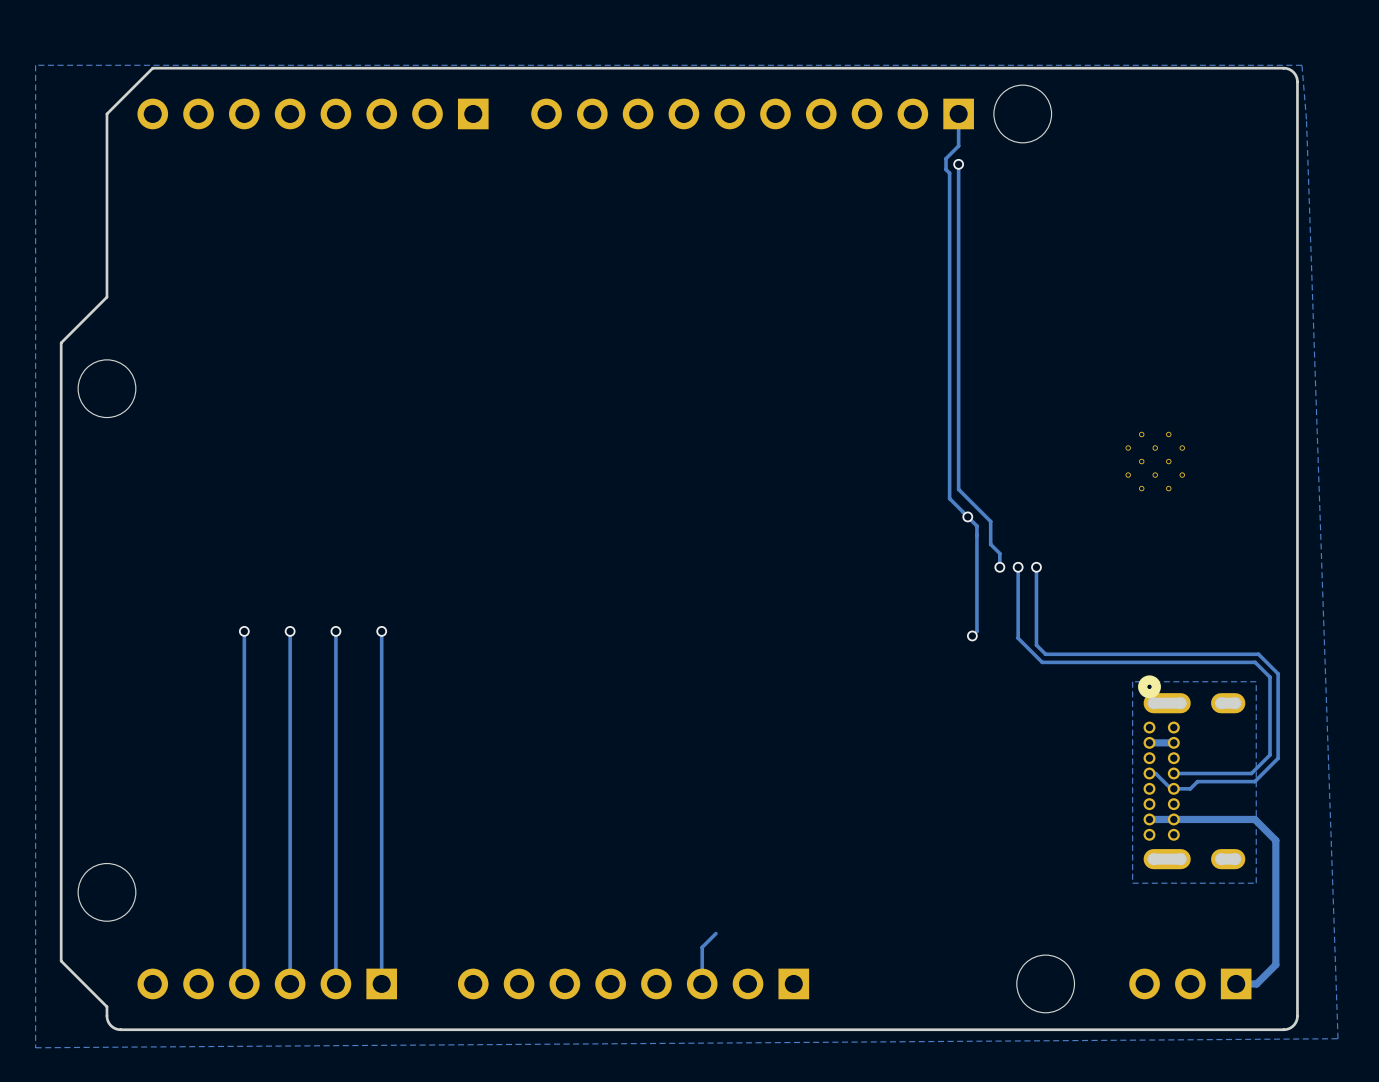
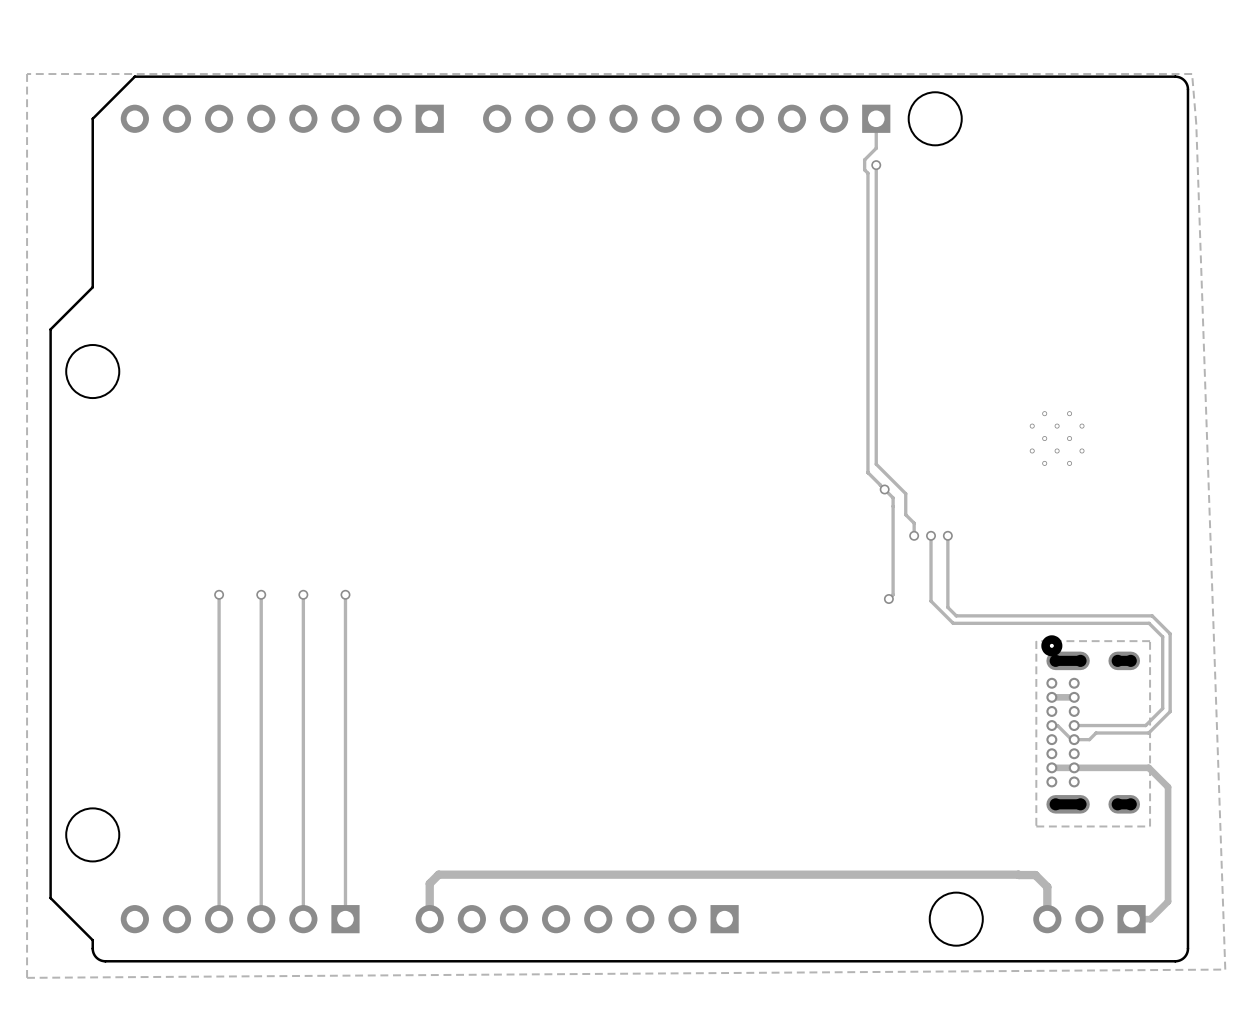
track: (715, 933) (702, 947) (702, 983) -> none
track: none -> (1047, 919) (1047, 886) (1035, 875) (1018, 874) (438, 874) (429, 883) (429, 919)

